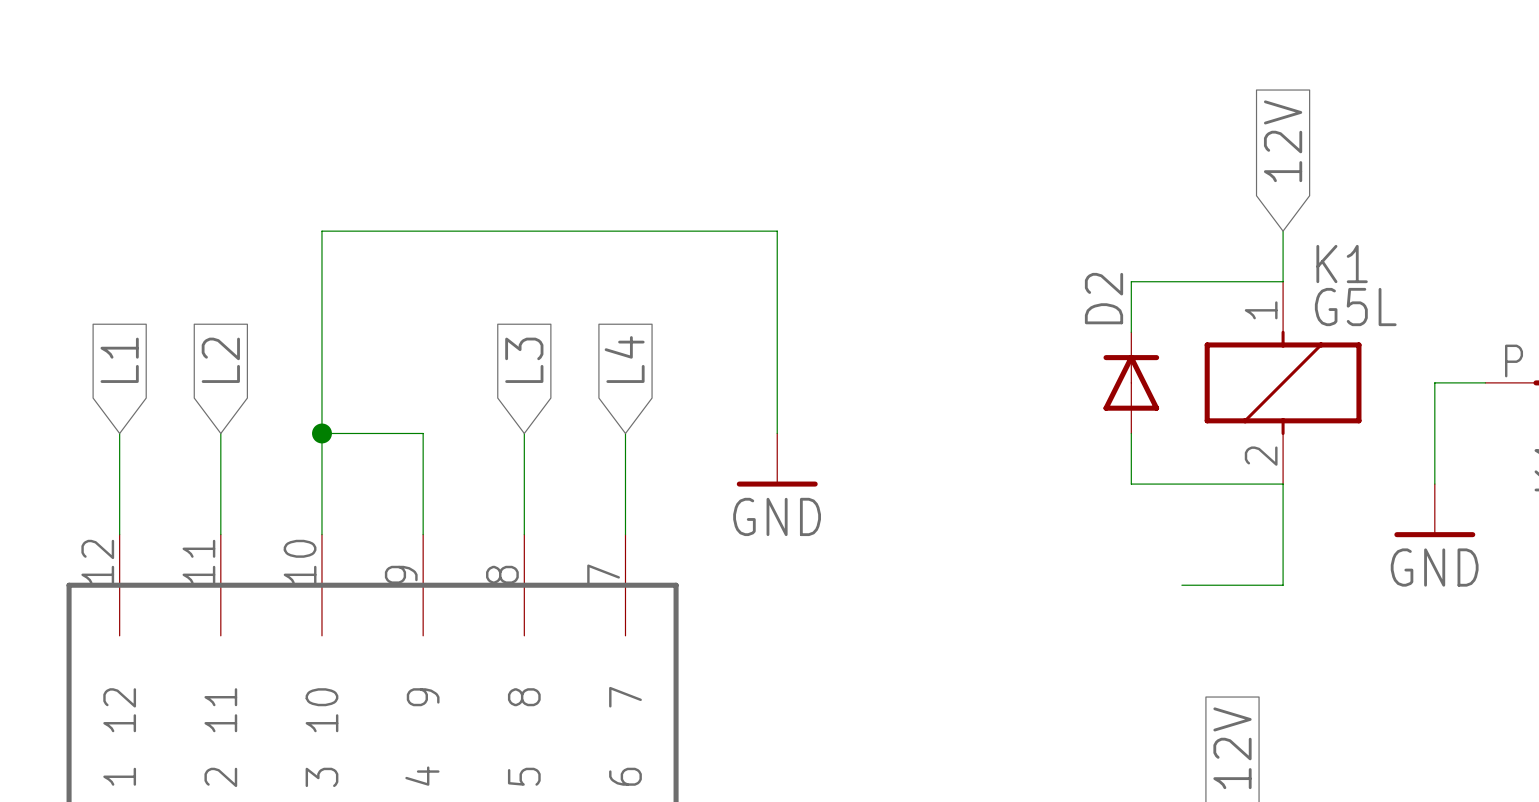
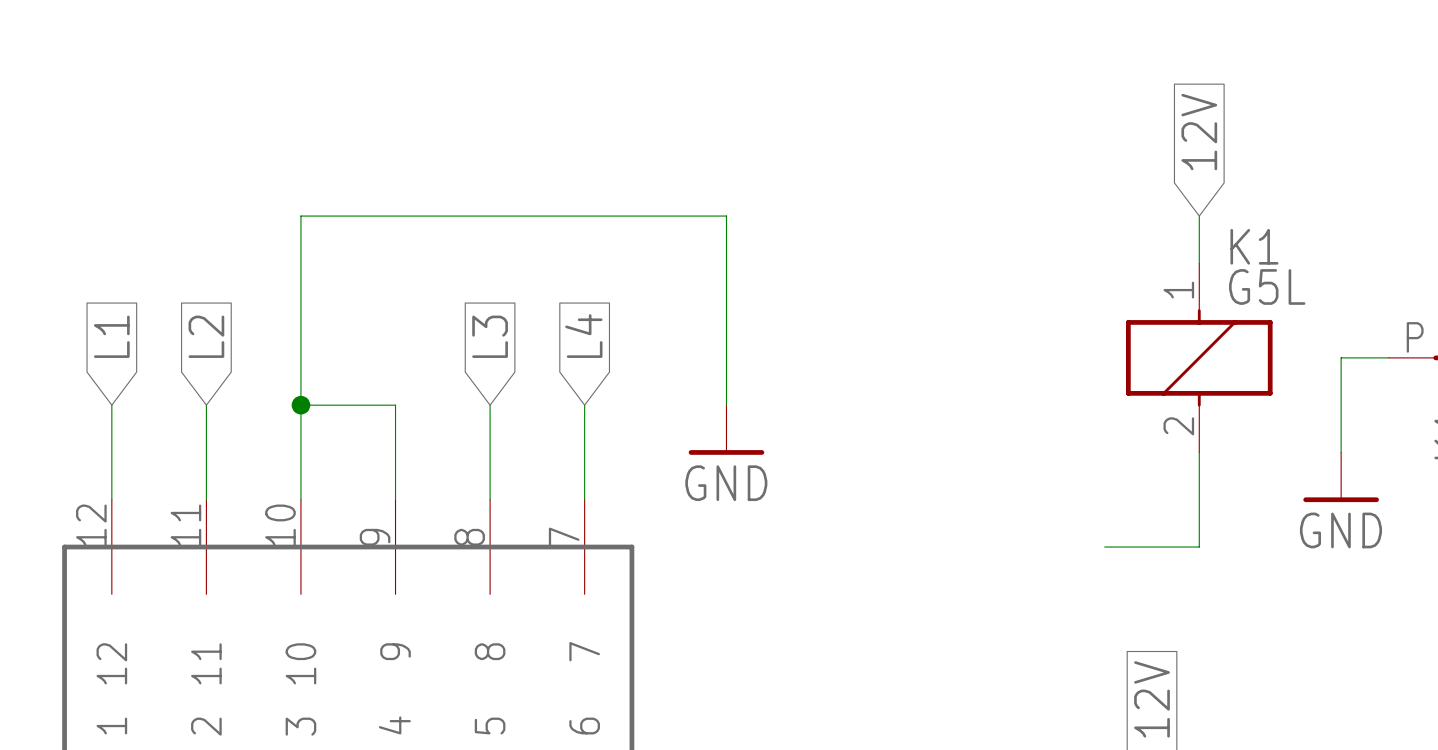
wire: (1283, 281) (1131, 281) (1131, 332) -> none
D2: (1131, 382) -> none
wire: (1131, 433) (1131, 484) (1283, 484) -> none

